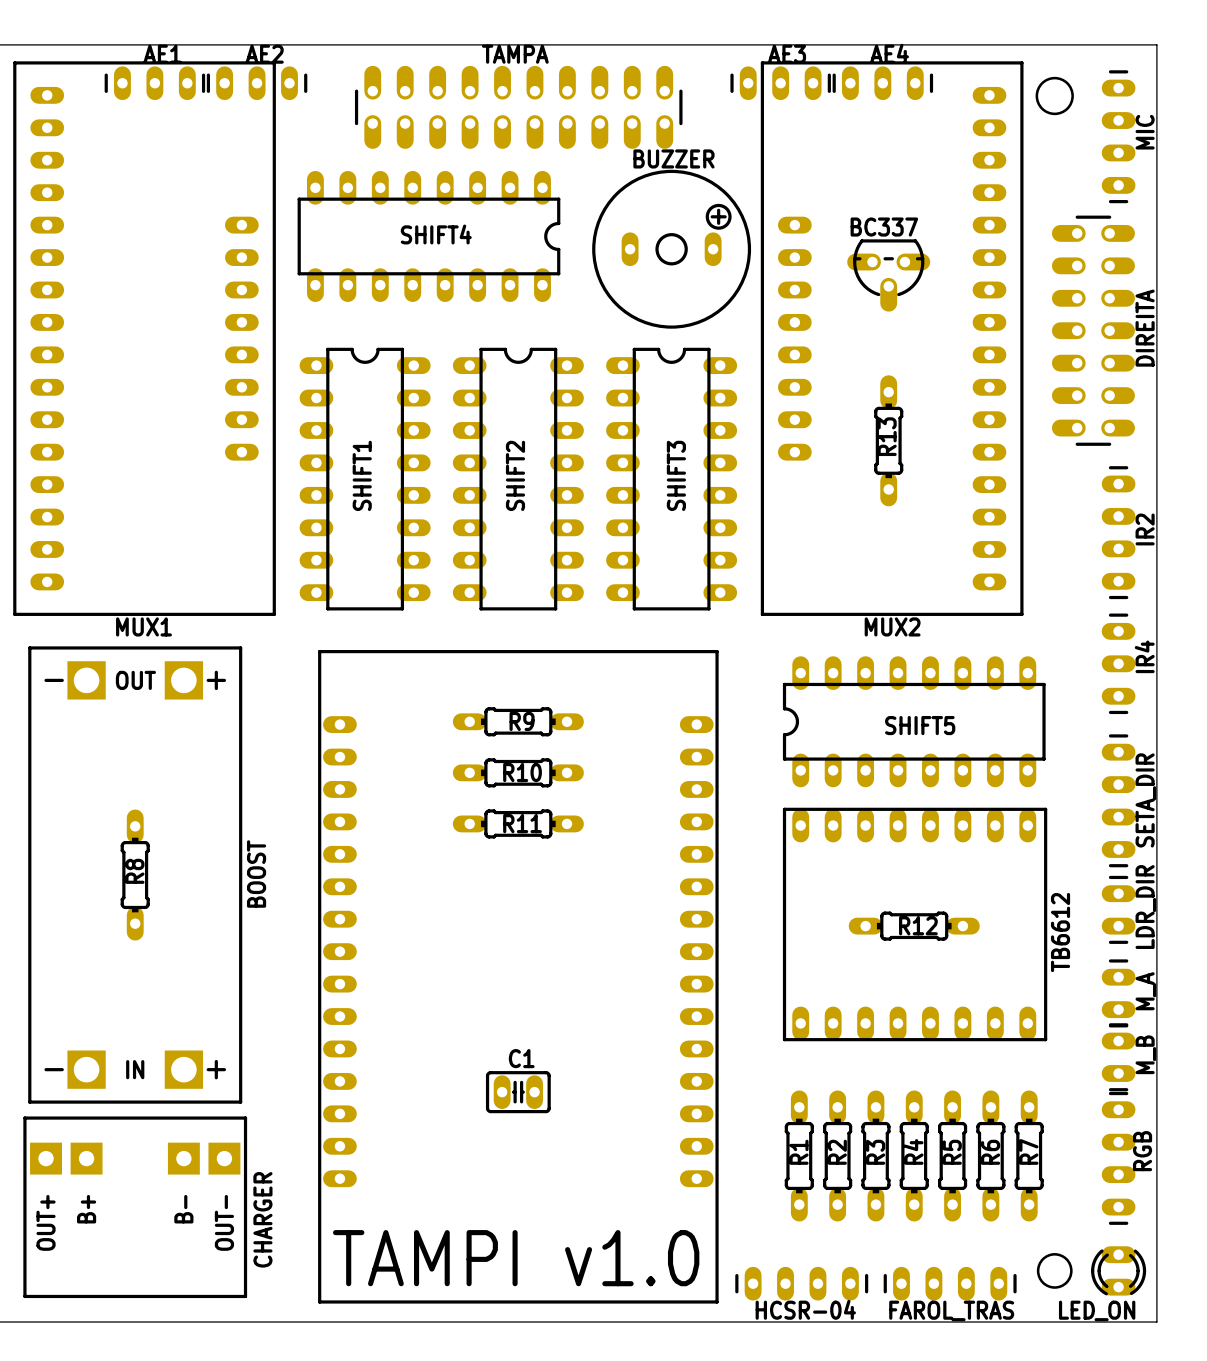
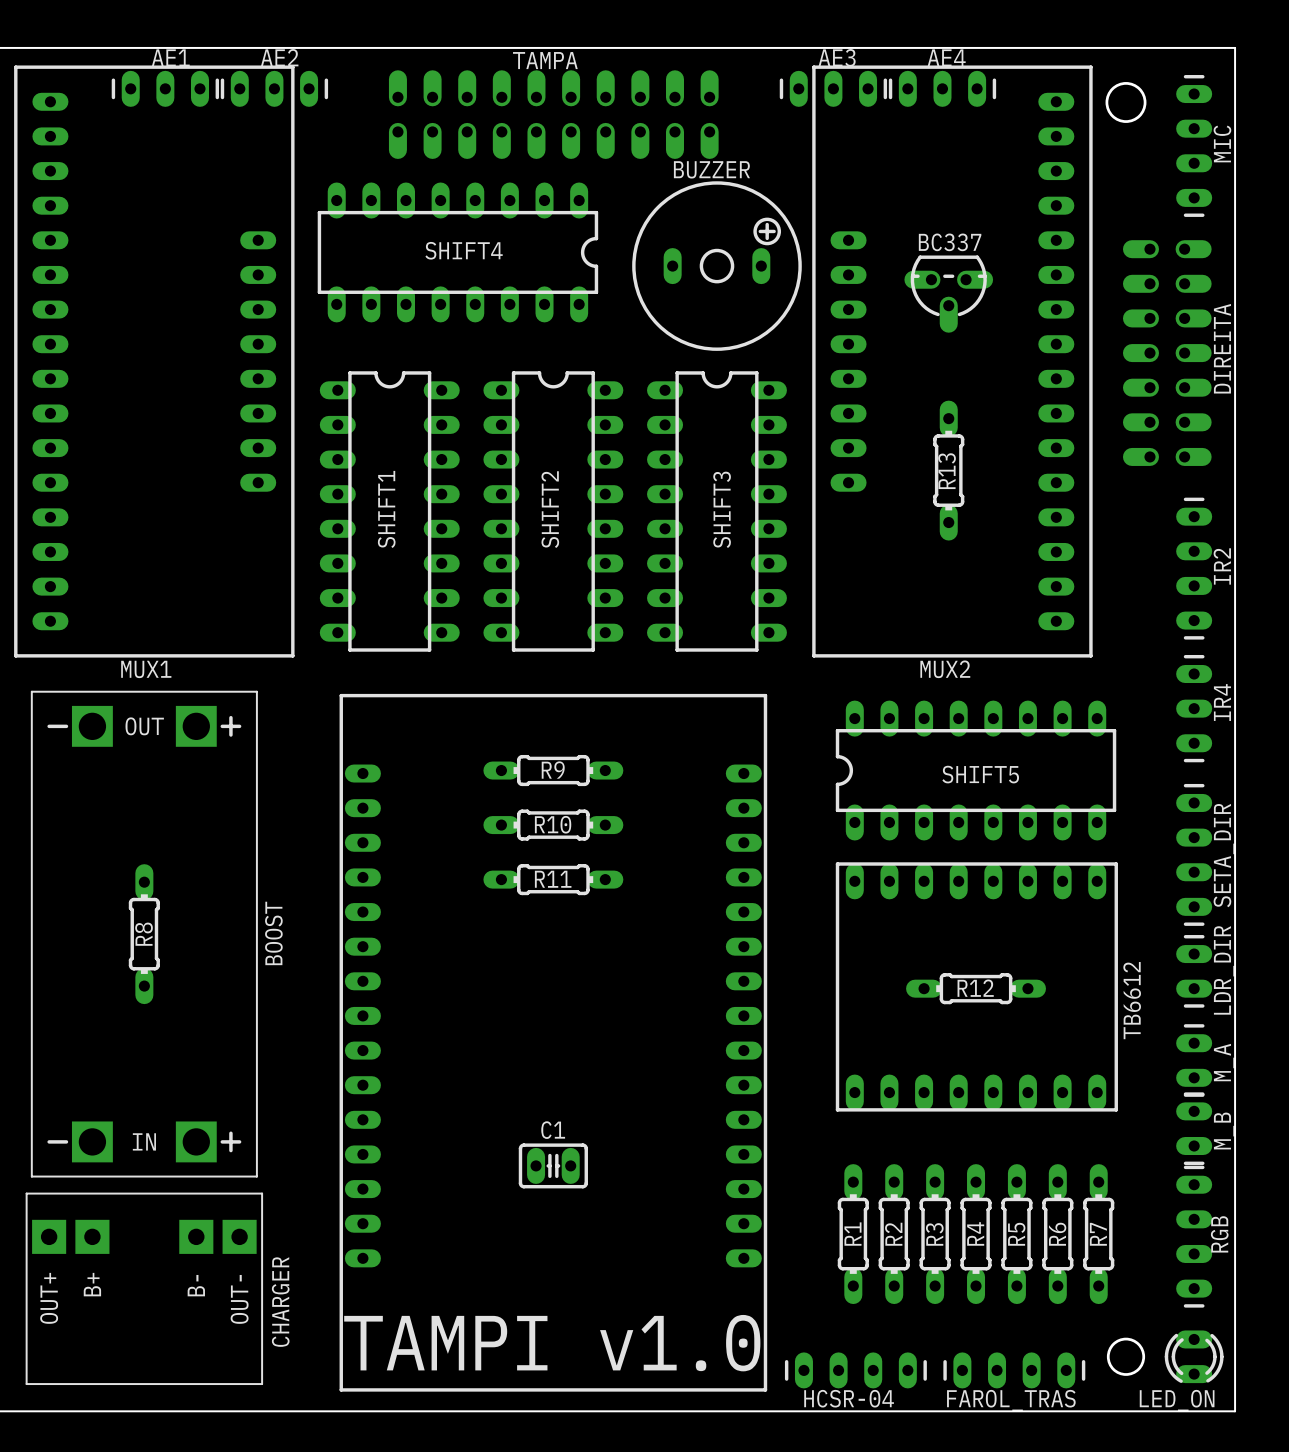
TAMPA footprint: [354, 65, 683, 149] -> [388, 70, 719, 159]
DIREITA footprint: [1051, 215, 1135, 446] -> [1122, 240, 1212, 466]
BOOST footprint: [28, 646, 243, 1104] -> [30, 690, 258, 1178]
CHARGER footprint: [23, 1116, 248, 1299] -> [25, 1192, 263, 1385]

